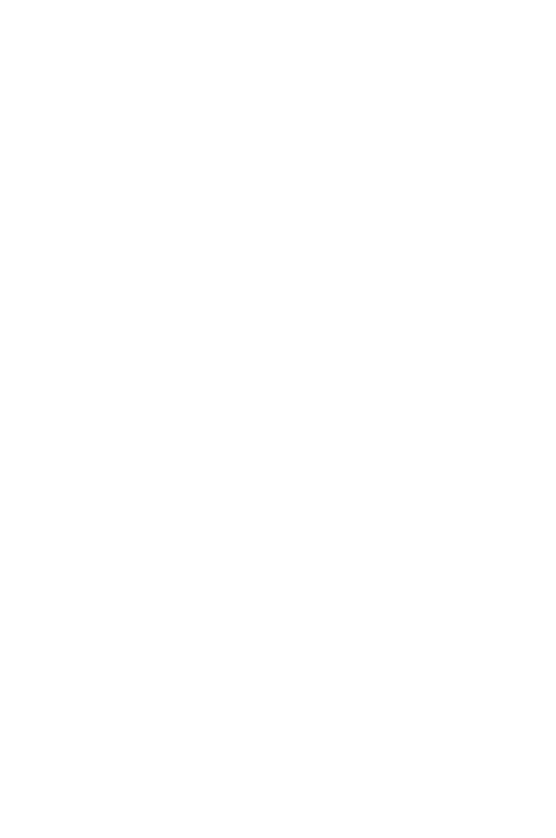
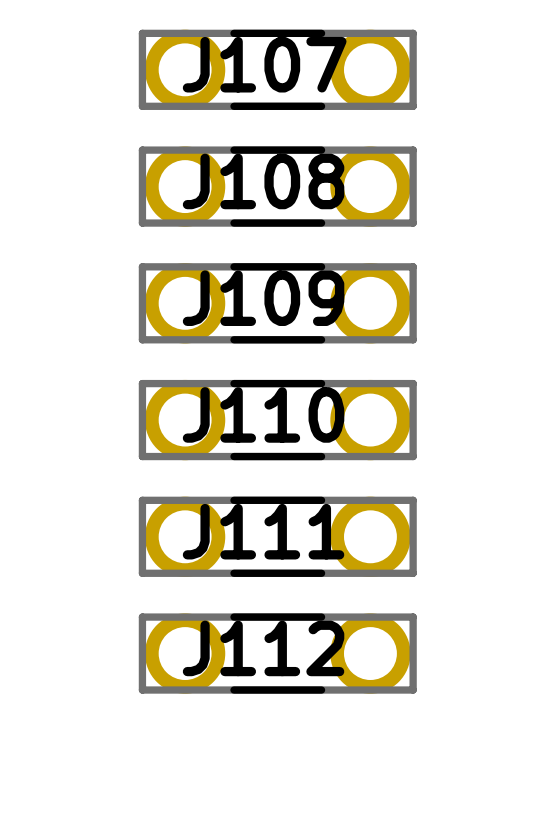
J107: none -> (277, 69)
J108: none -> (277, 186)
J109: none -> (277, 303)
J110: none -> (277, 420)
J111: none -> (277, 536)
J112: none -> (277, 653)

